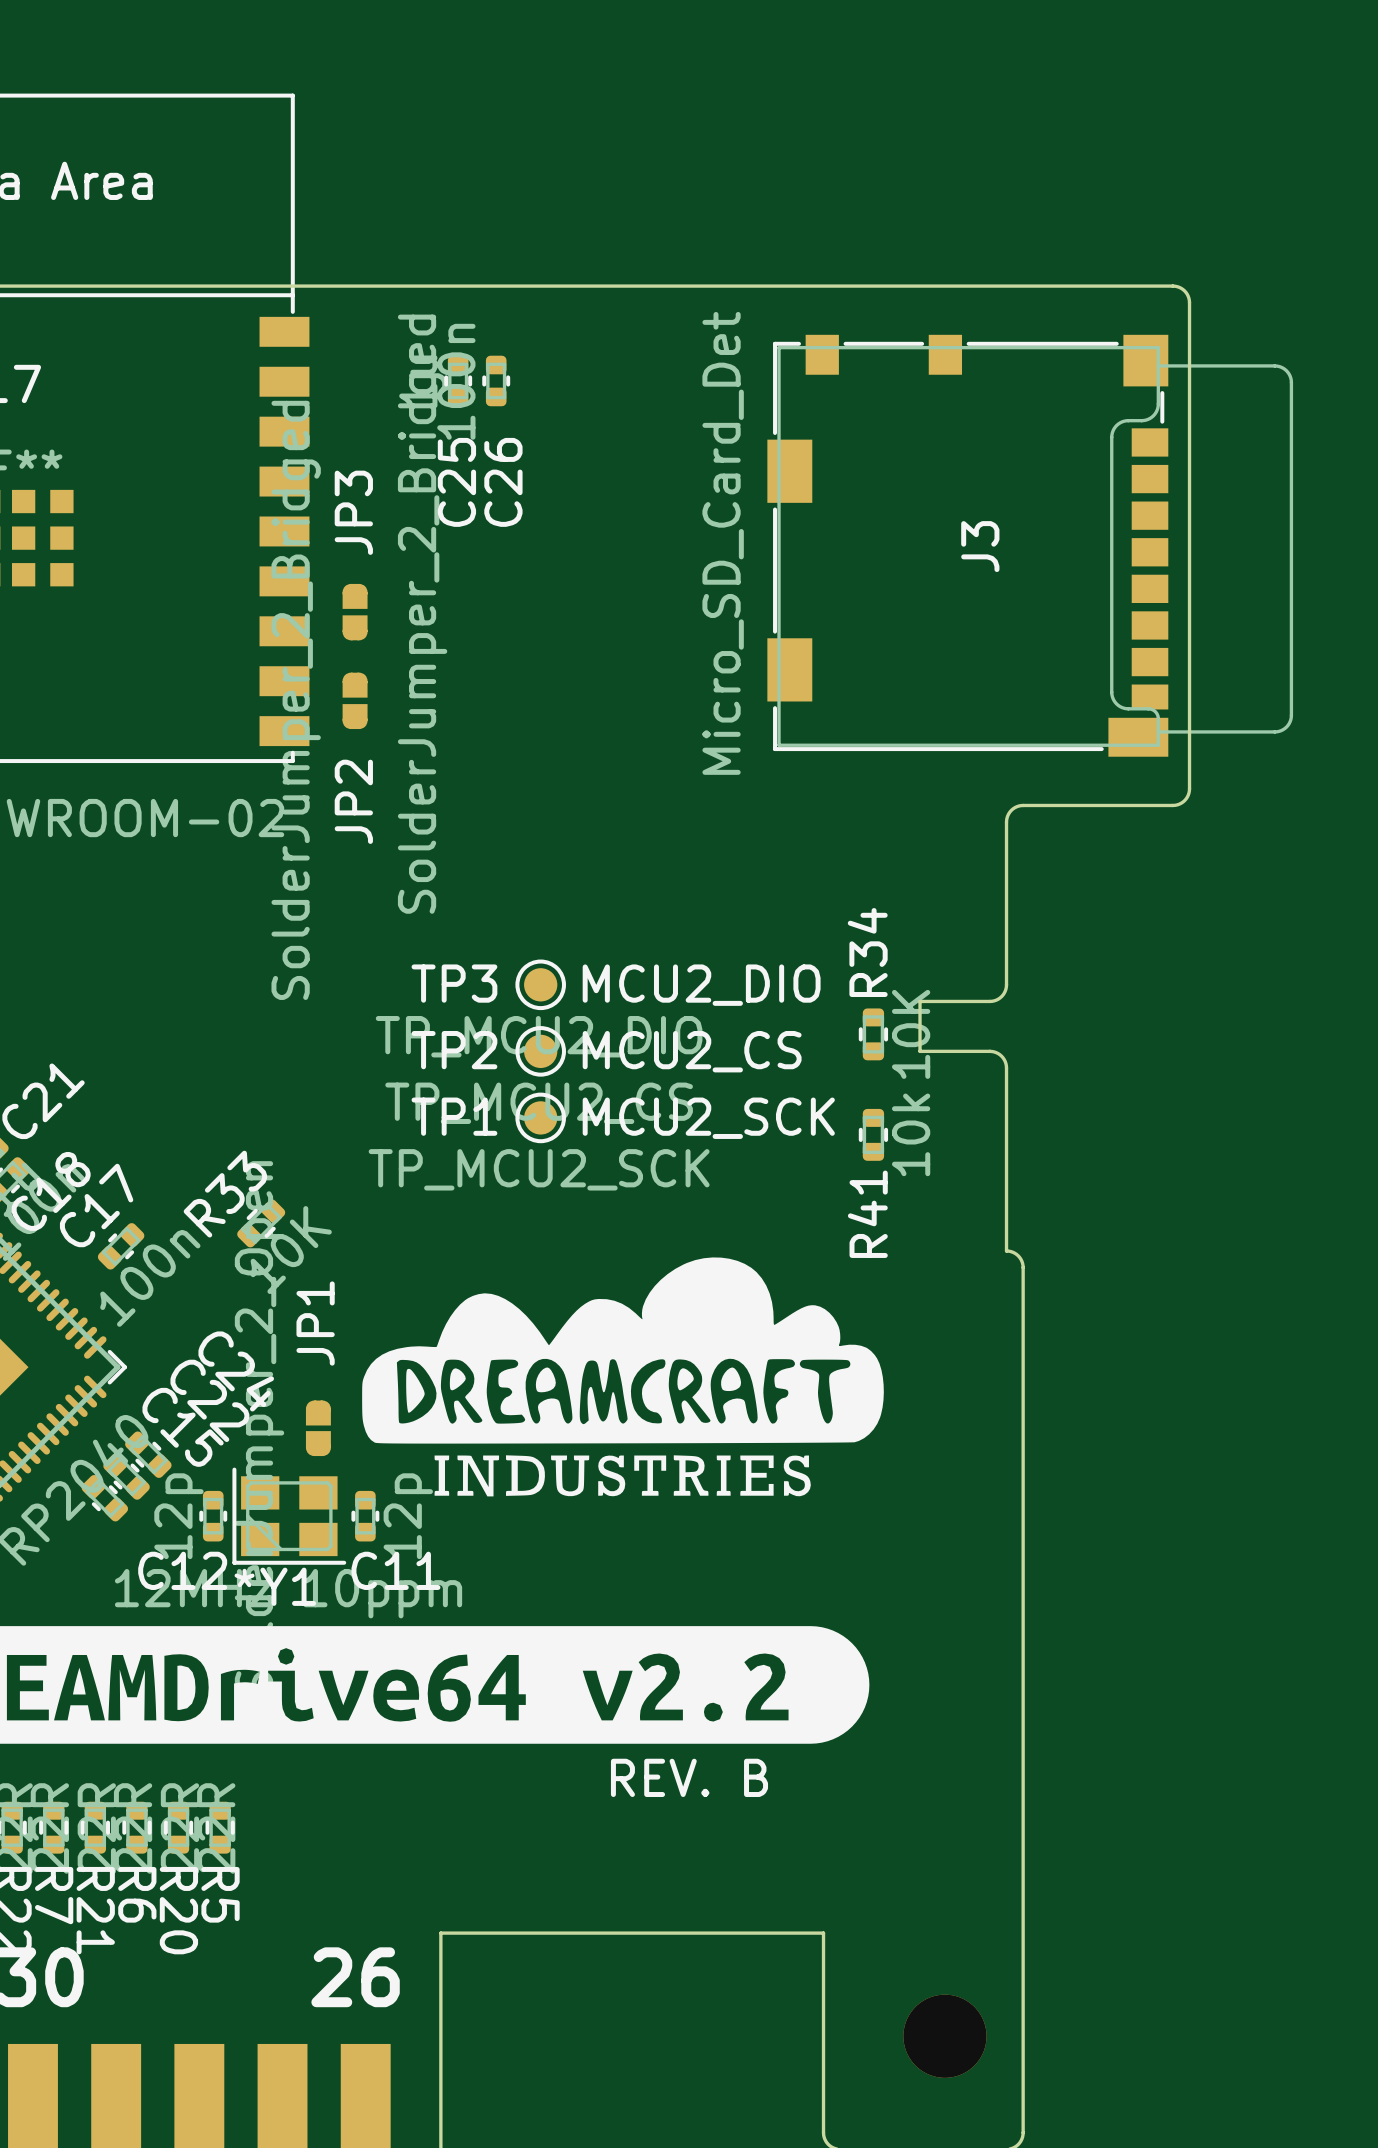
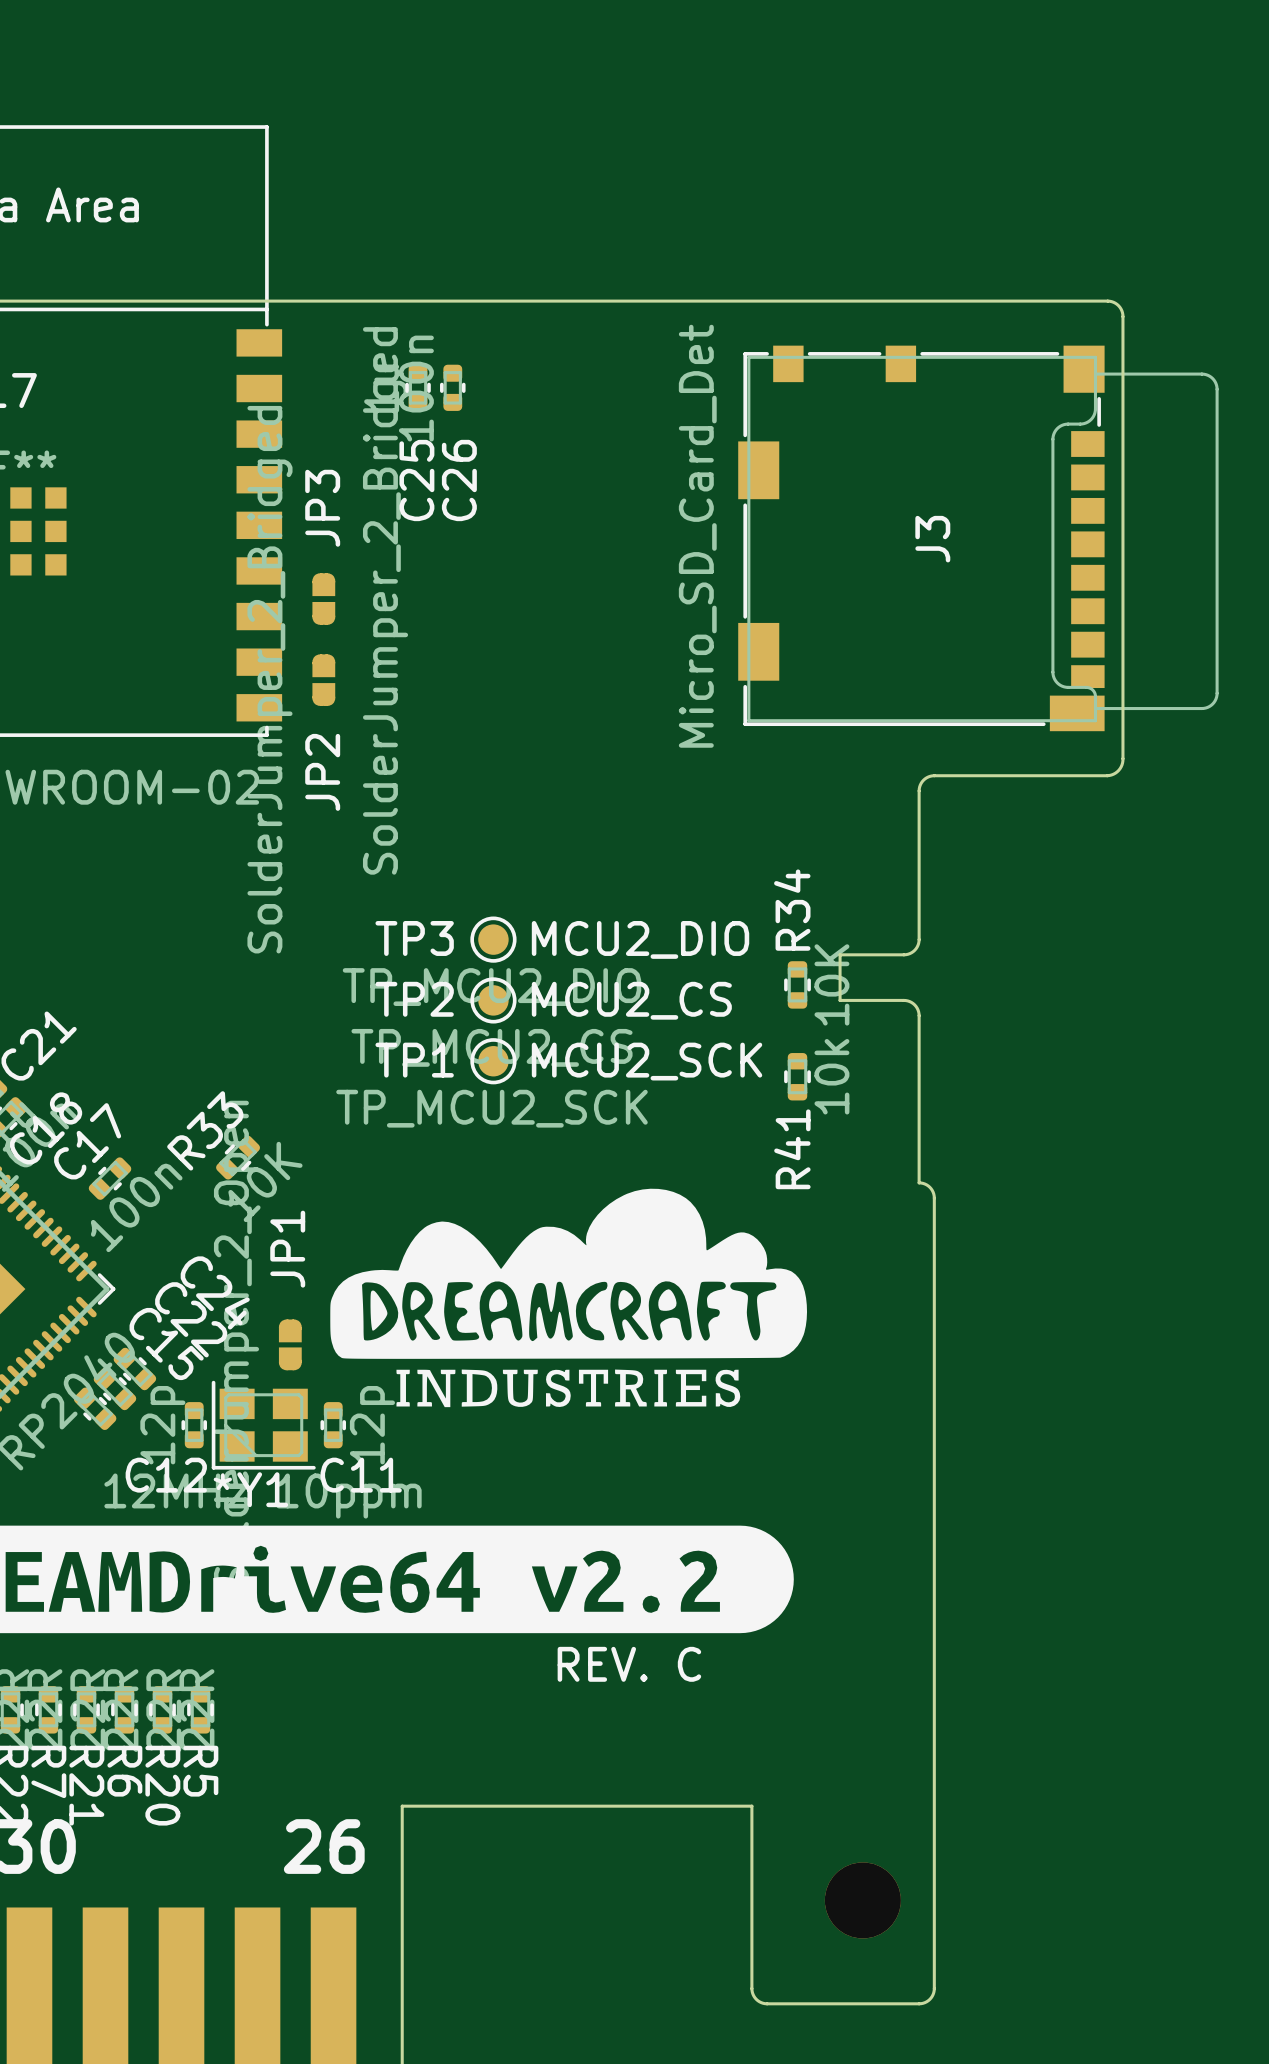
board edge: (1172, 286) (1184, 290) (1189, 302) (1189, 788) (1184, 800) (1172, 805) -> (1071, 301) (1111, 301) (1119, 307) (1122, 316) (1122, 760) (1118, 770) (1111, 774) (1071, 775)
J3 position: (1030, 545) -> (978, 538)
text: REV. B (689, 1777) -> REV. C (629, 1664)

